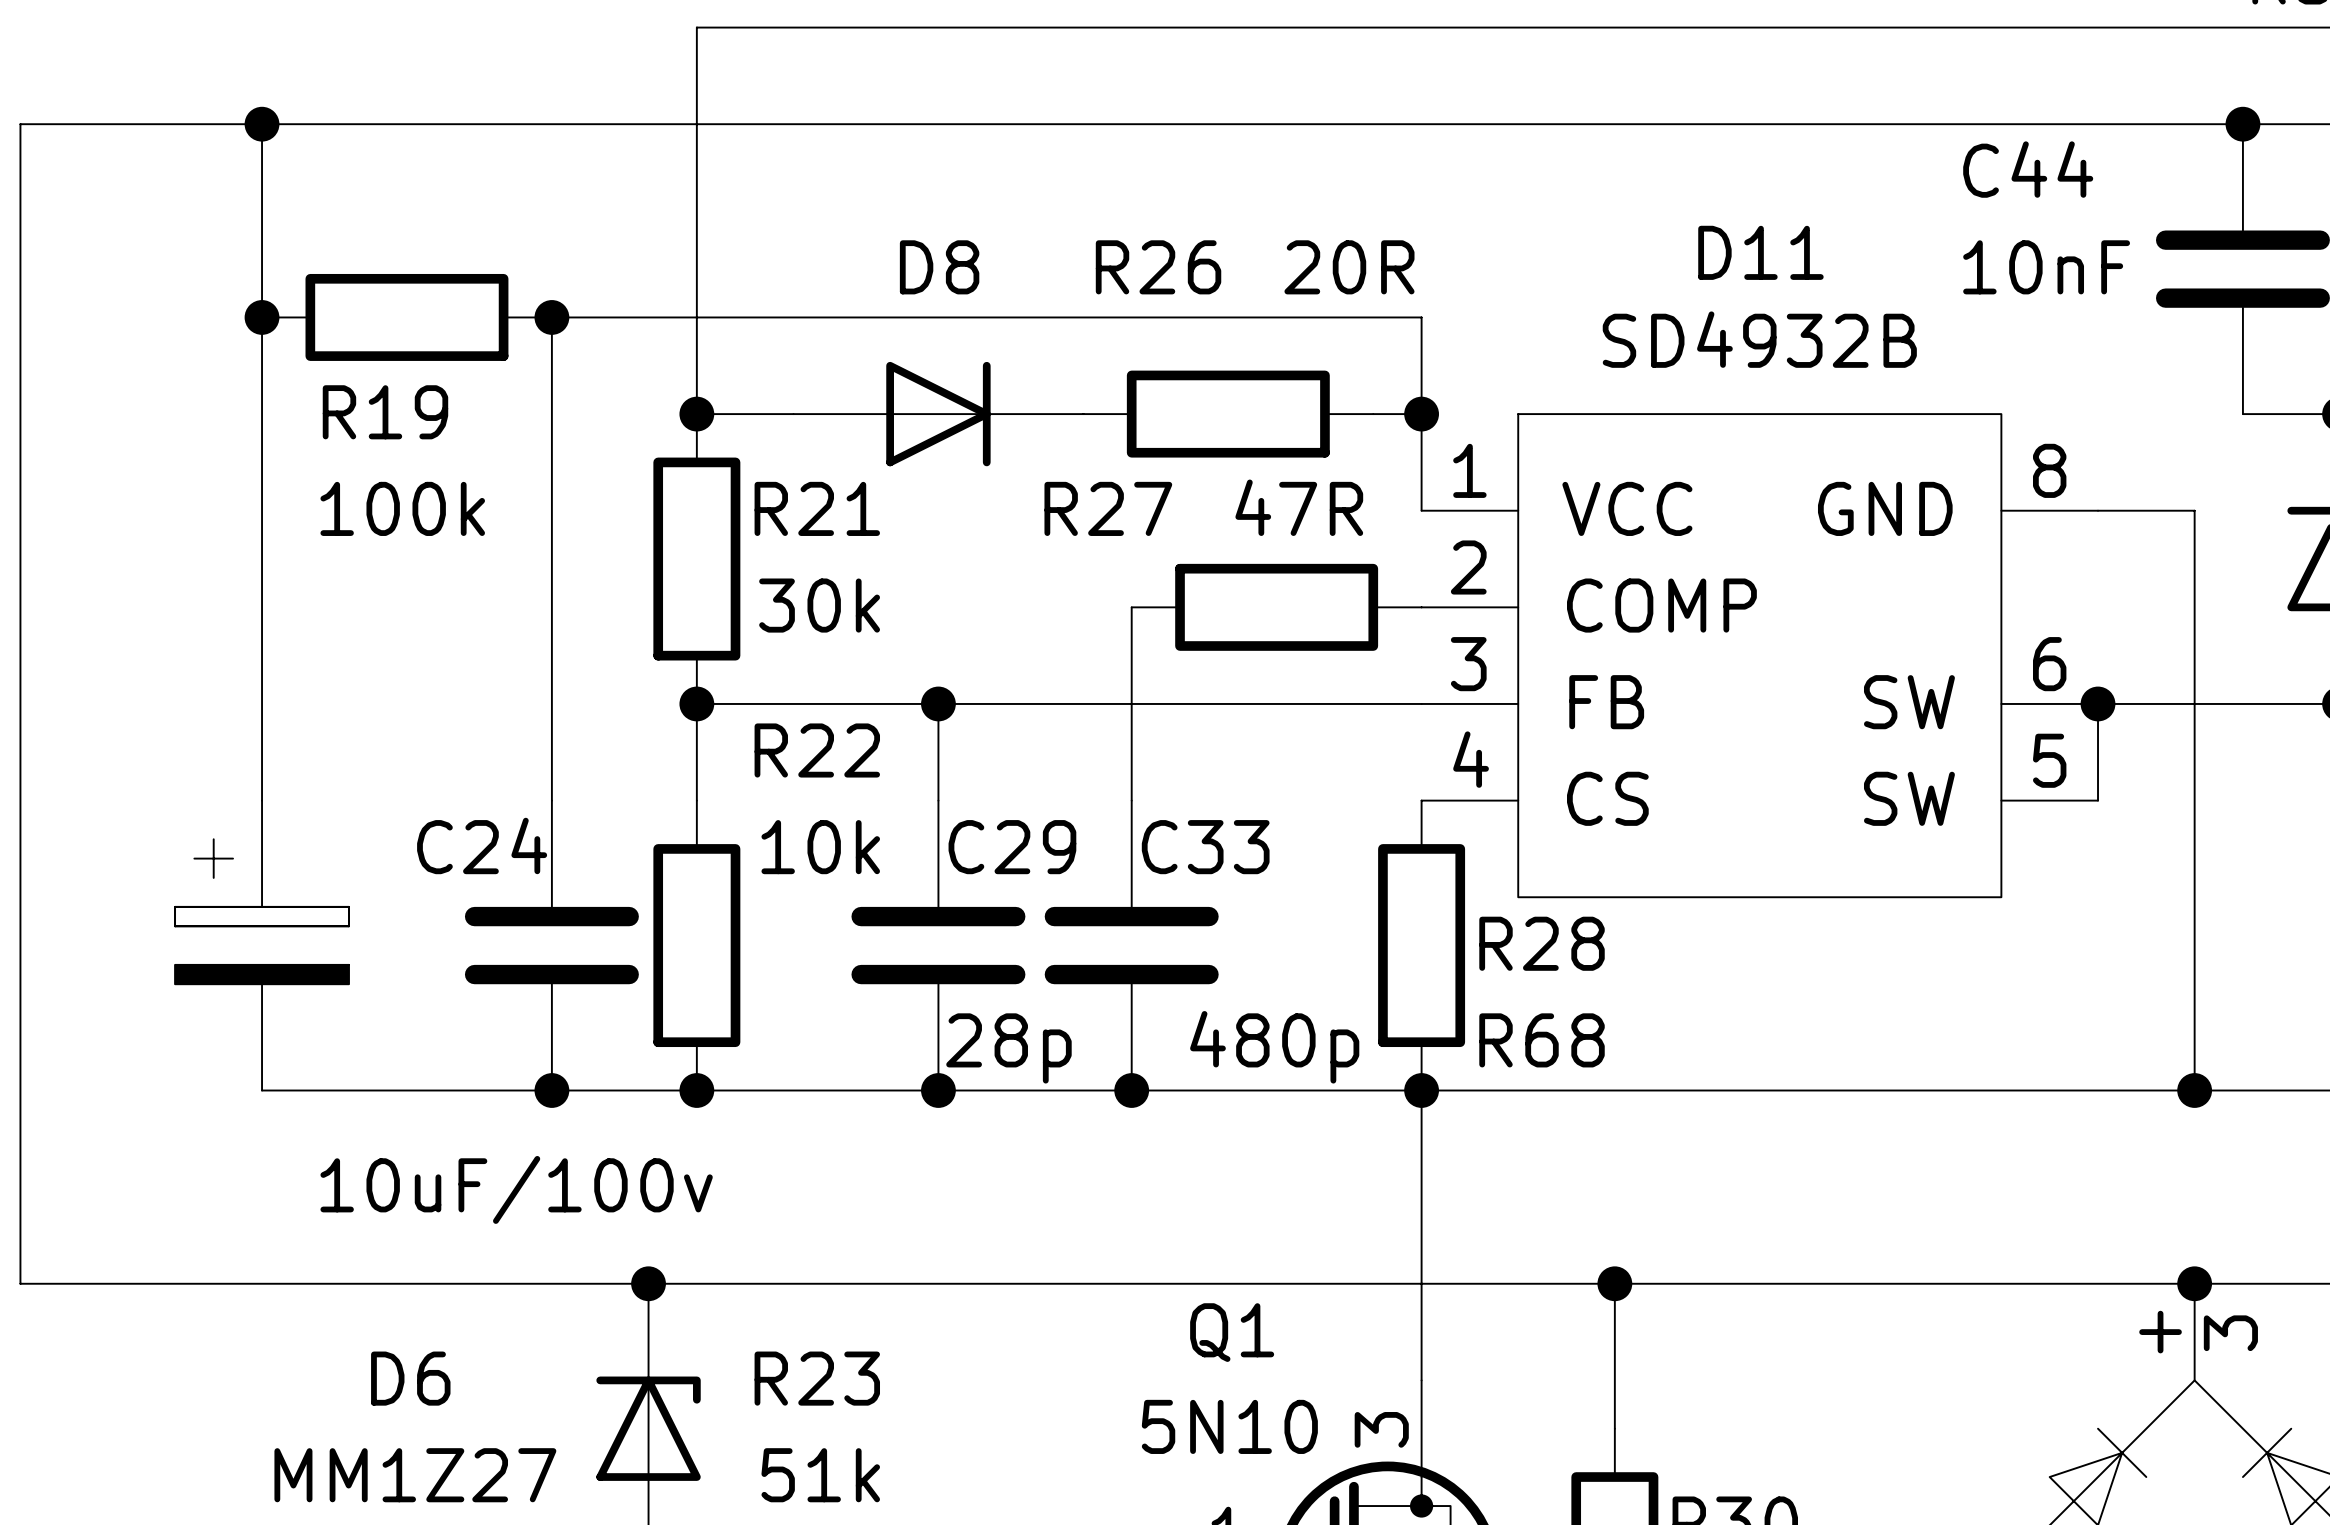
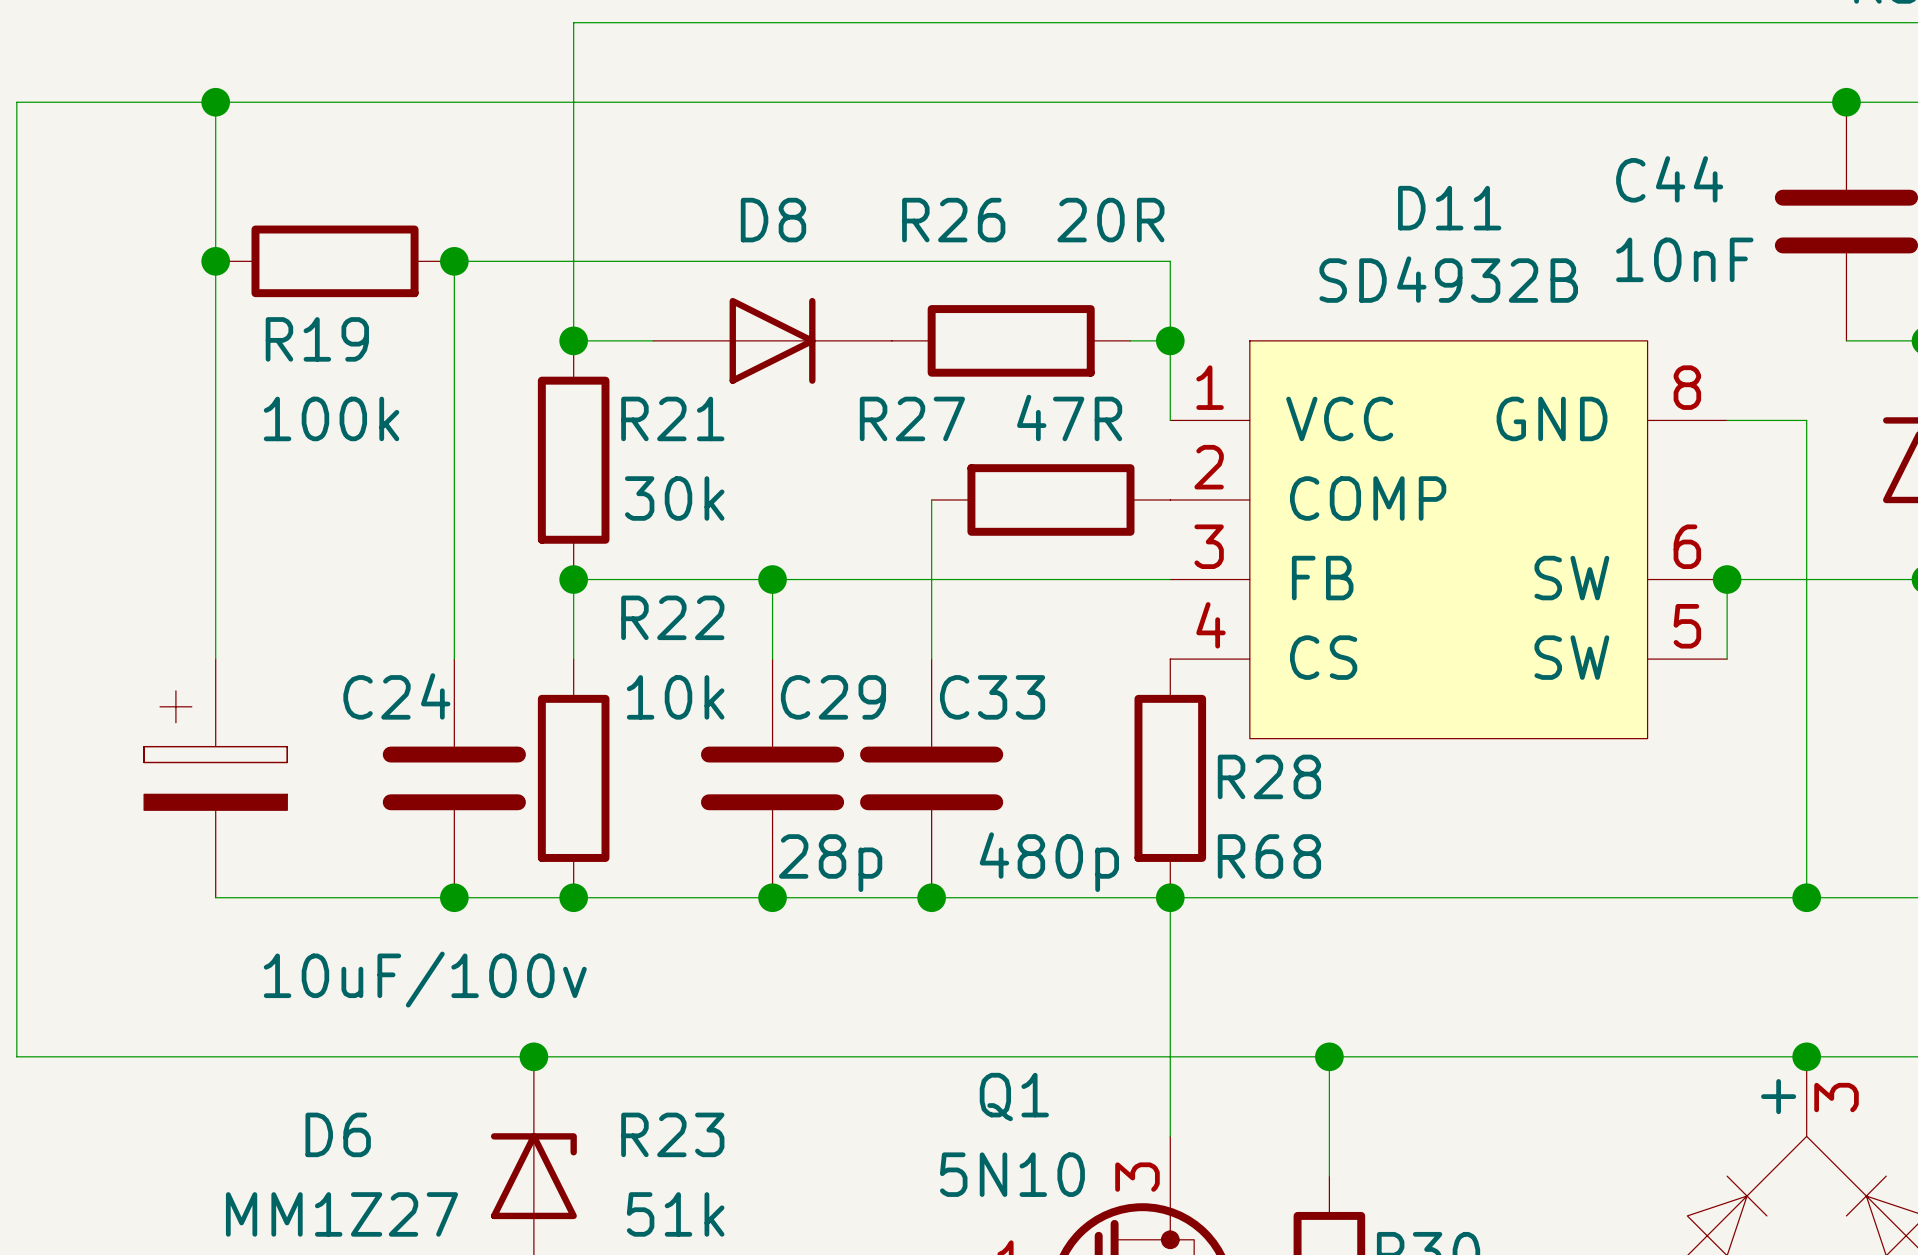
C44 name position: C44 (2028, 169) -> C44 (1669, 179)
C44 value position: 10nF (2046, 267) -> 10nF (1684, 259)

